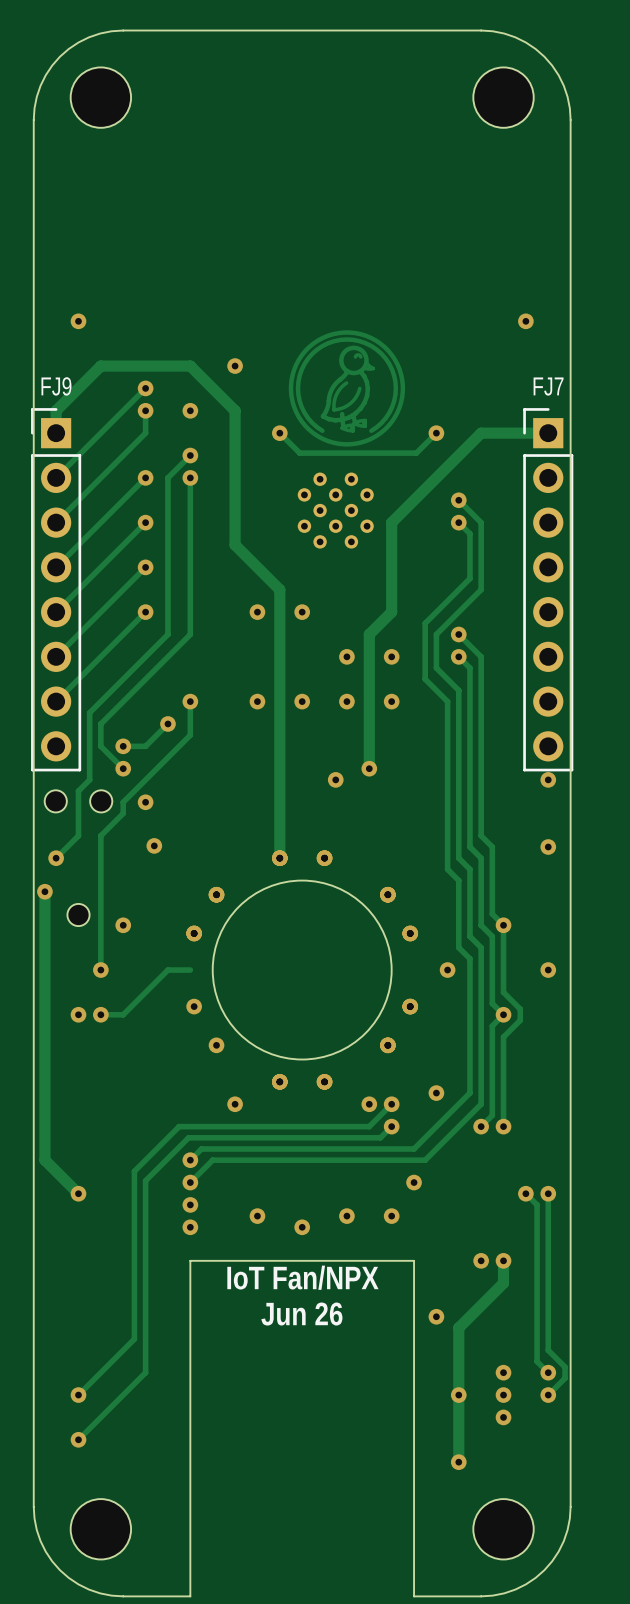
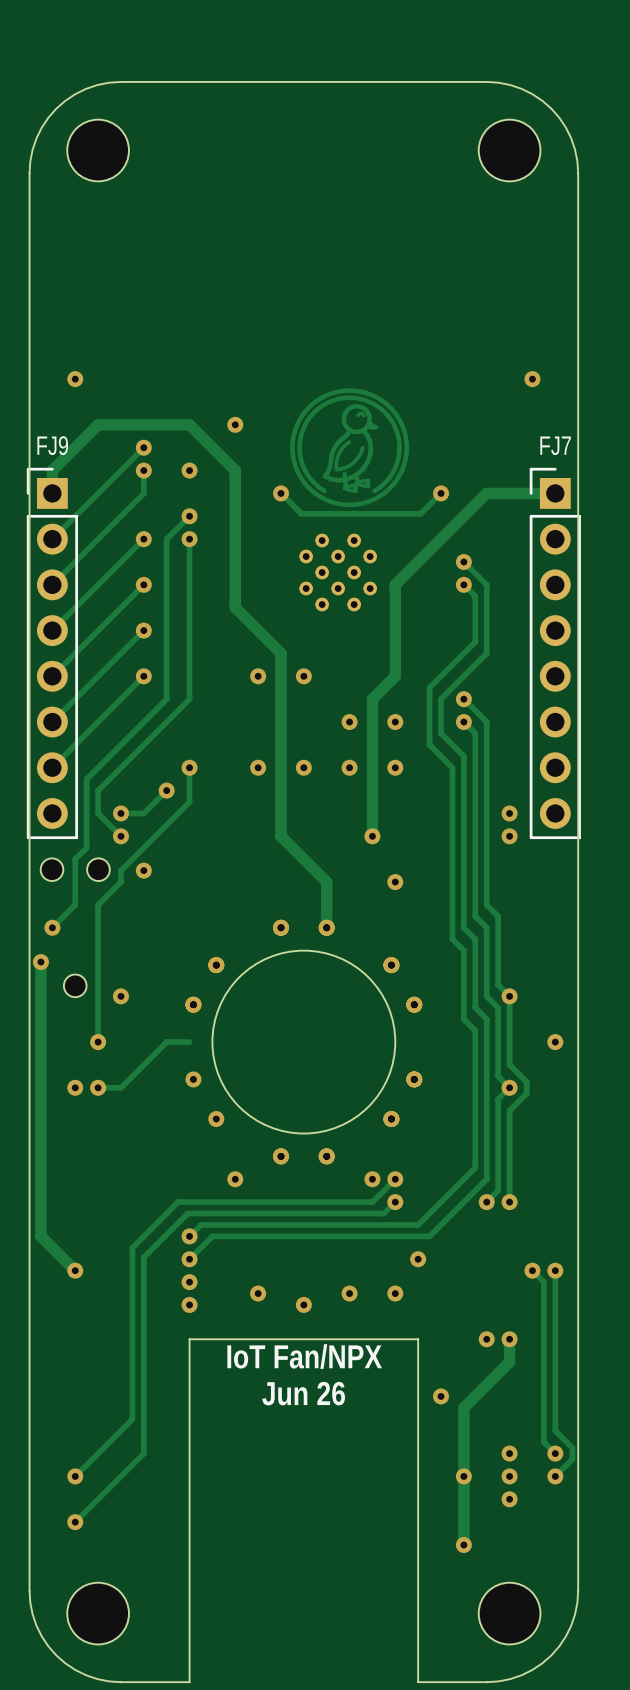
via: none -> (509, 813)
track: (279, 768) (279, 858) -> (281, 836) (326, 882) (326, 927)
via: none -> (509, 836)
via position: (335, 779) -> (395, 882)
via: (548, 779) -> none
via: (154, 845) -> none
via: (548, 847) -> none
via: (447, 970) -> none
via: (436, 1093) -> none

